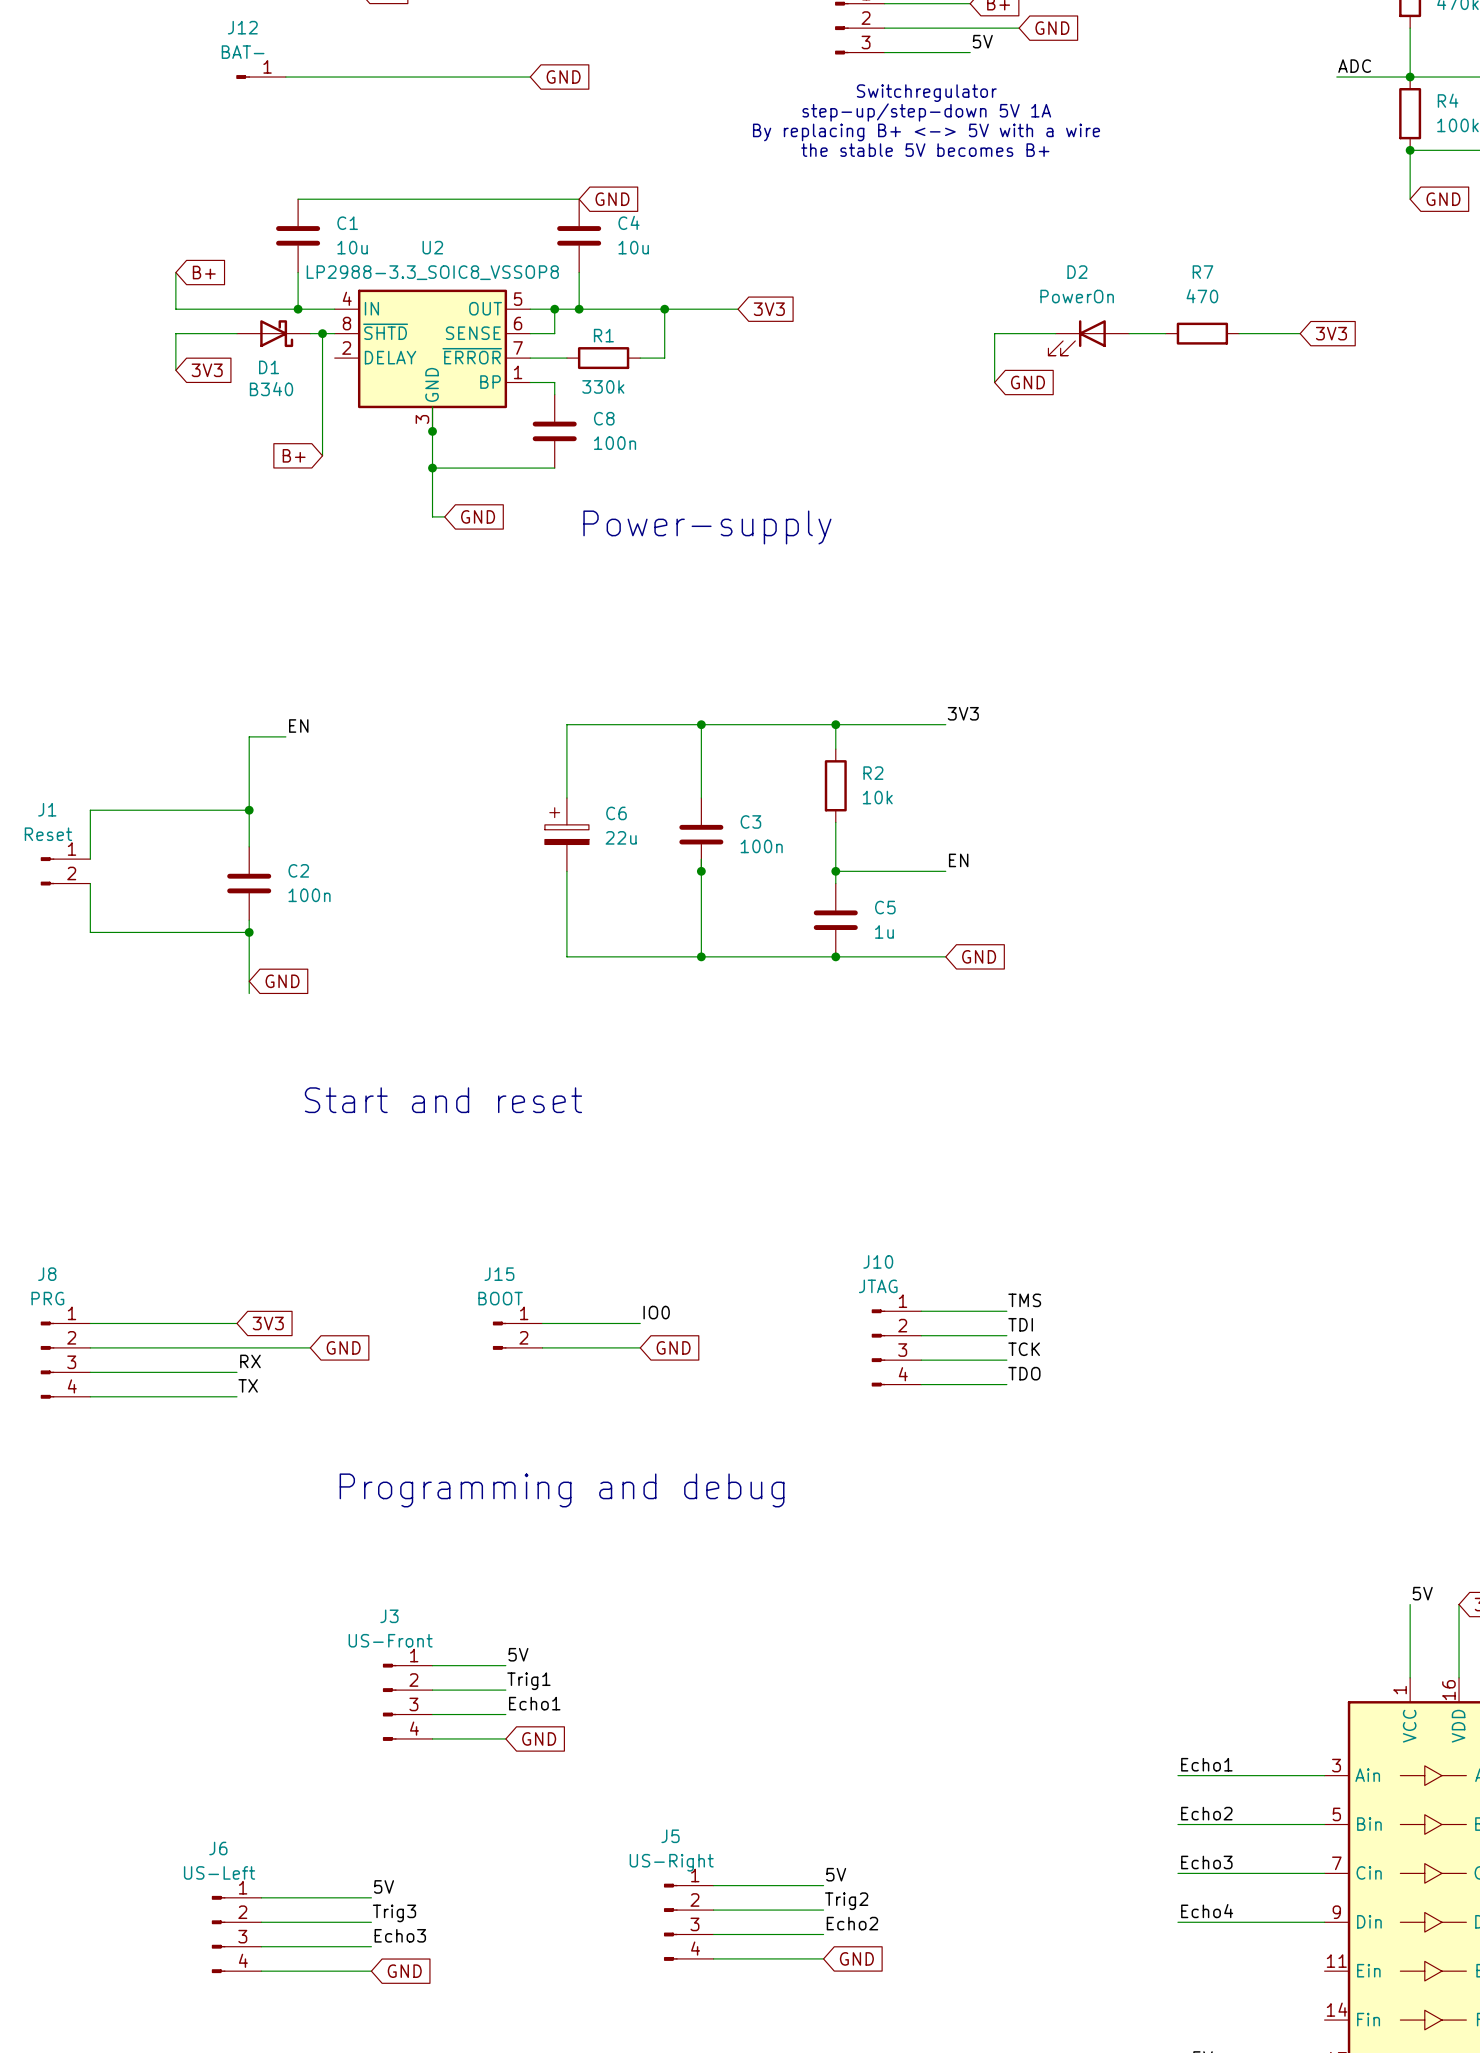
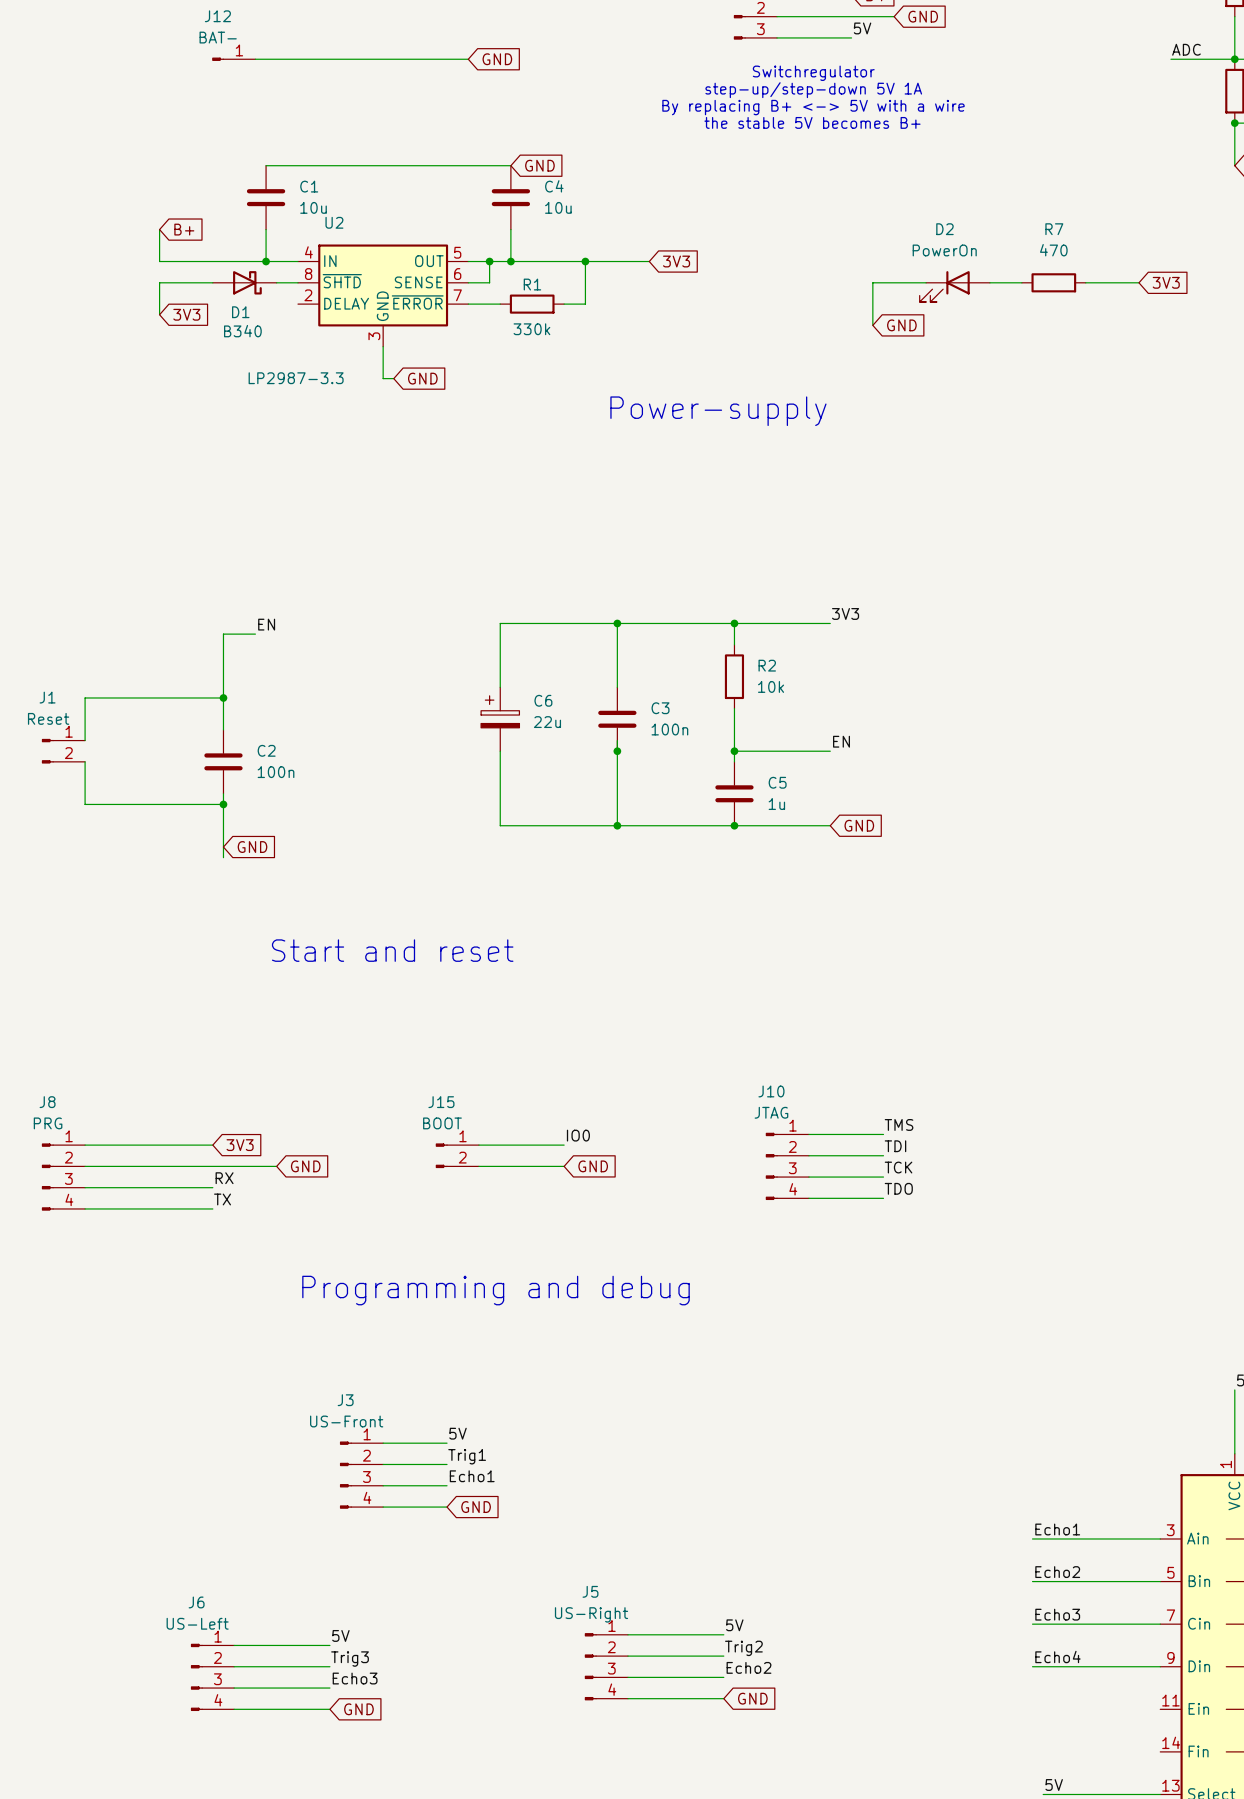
U2 name position: U2 (432, 247) -> U2 (334, 222)
U2 value: LP2988-3.3_SOIC8_VSSOP8 (432, 272) -> LP2987-3.3 (296, 378)
U2 symbol: [334, 289, 531, 432] -> [297, 244, 469, 347]
wire: (322, 333) (322, 455) -> none
junction: (322, 333) -> none
wire: (530, 382) (554, 382) (554, 394) -> none
junction: (432, 431) -> none
C8: 100n (554, 431) -> none
wire: (432, 443) (432, 516) (444, 516) -> (383, 378) (393, 378)
global label: B+ (294, 455) -> none
wire: (432, 468) (554, 468) -> none
junction: (432, 468) -> none
global label position: GND (478, 516) -> GND (422, 378)
text position: Power-supply (707, 527) -> Power-supply (718, 411)

